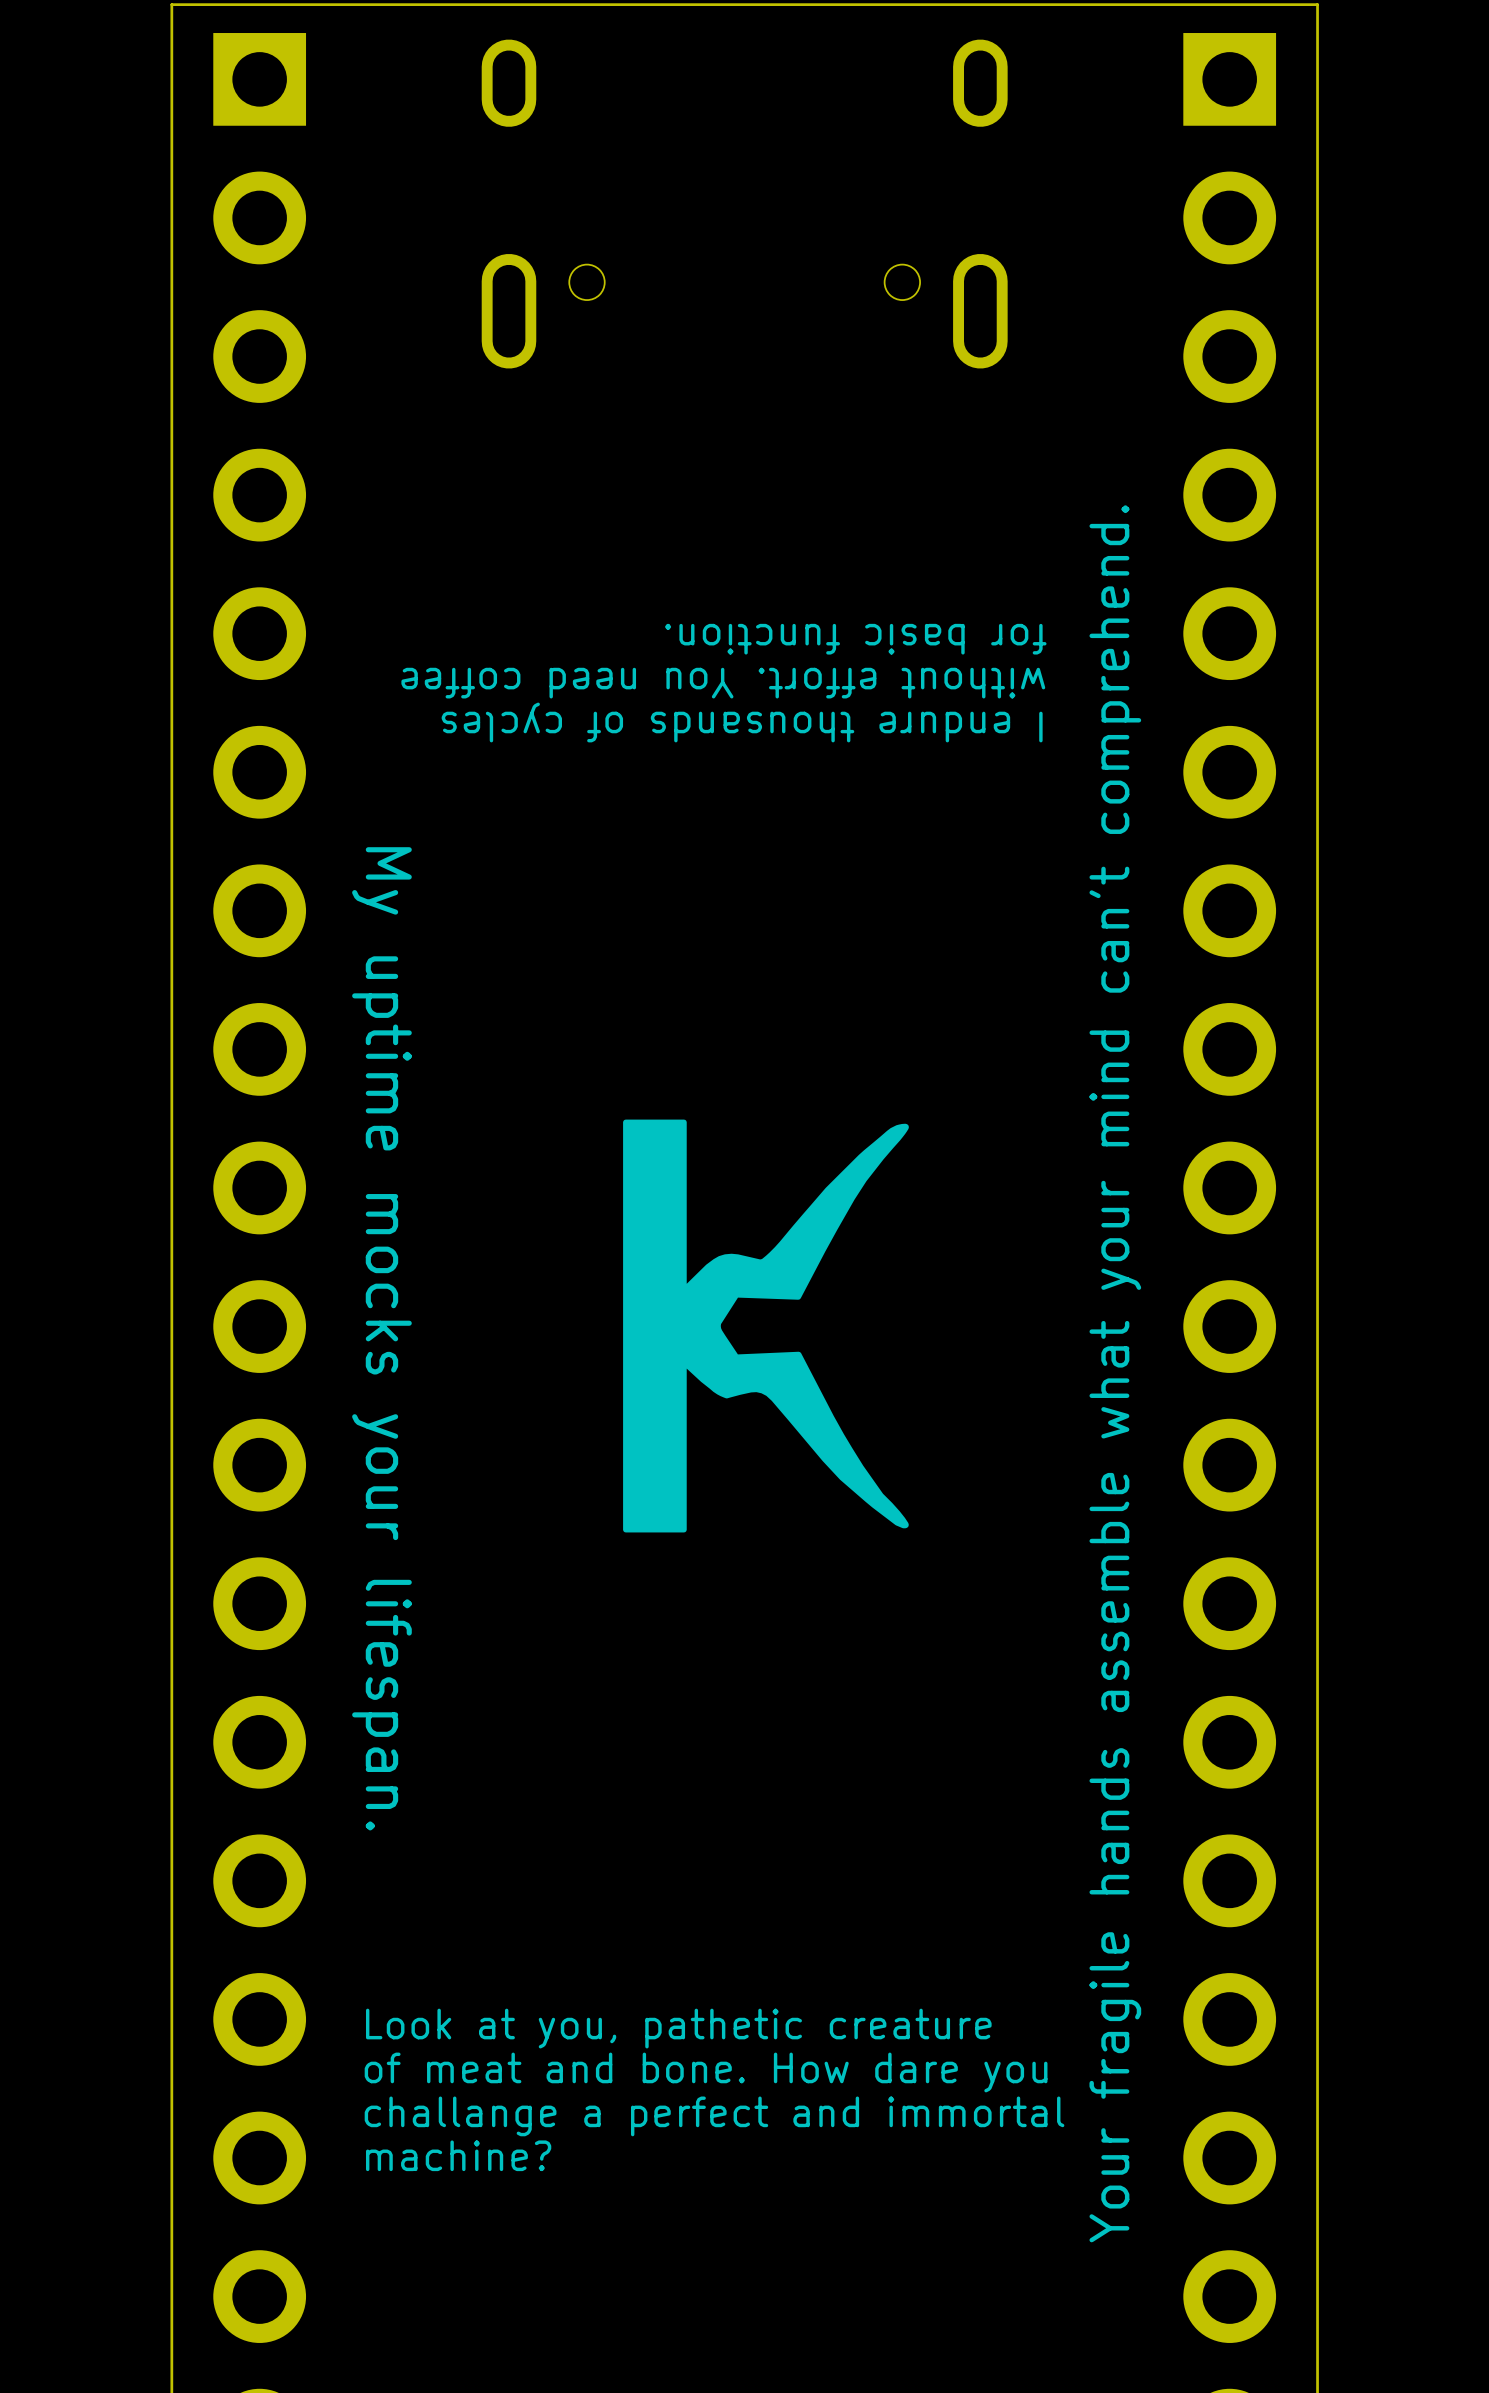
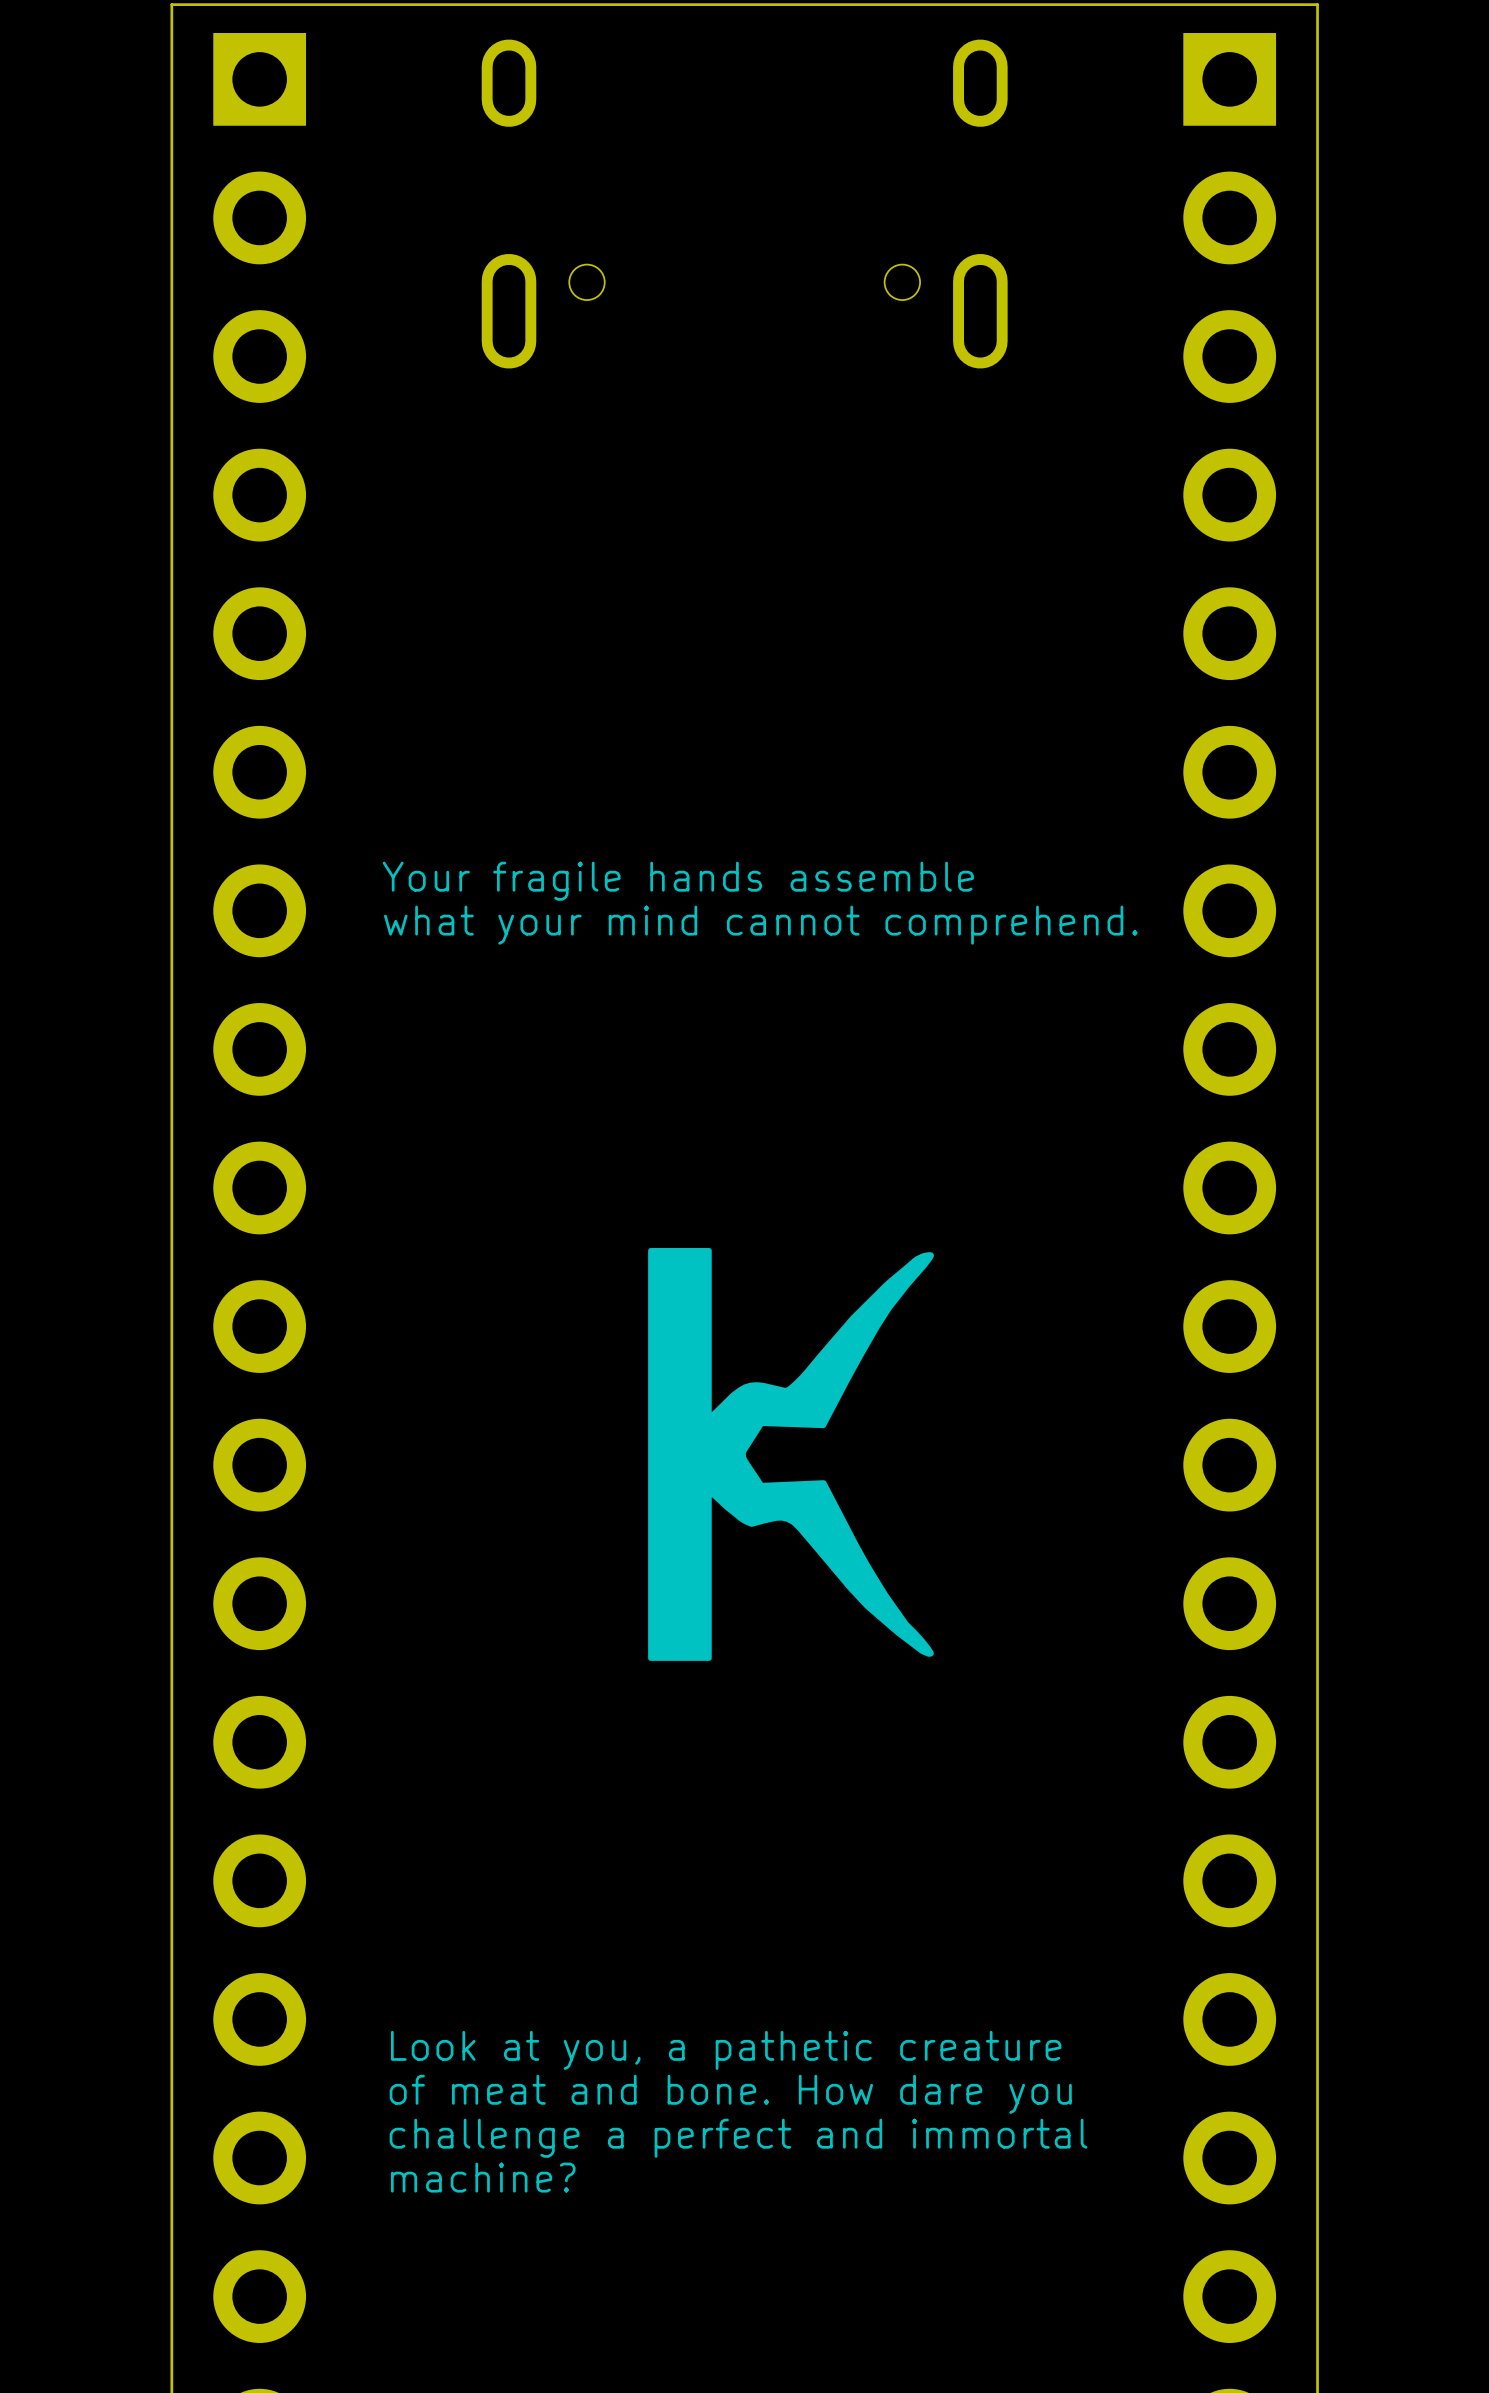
text: for basic function. (855, 639) -> none
text: without effort. You need coffee (723, 683) -> none
text: I endure thousands of cycles (742, 722) -> none
text: none -> Your fragile hands assemble (678, 881)
text: none -> what your mind cannot comprehend. (760, 925)
drawing position: (765, 1326) -> (790, 1454)
text: My uptime mocks your lifespan. (381, 1338) -> none
text: Your fragile hands assemble what your mind can't comprehend. (1115, 1373) -> none
text: Look at you, pathetic creature (678, 2028) -> Look at you, a pathetic creature (726, 2050)
text position: of meat and bone. How dare you (706, 2072) -> of meat and bone. How dare you (730, 2094)
text: challange a perfect and immortal (714, 2116) -> challenge a perfect and immortal (738, 2138)
text position: machine? (458, 2155) -> machine? (483, 2177)

